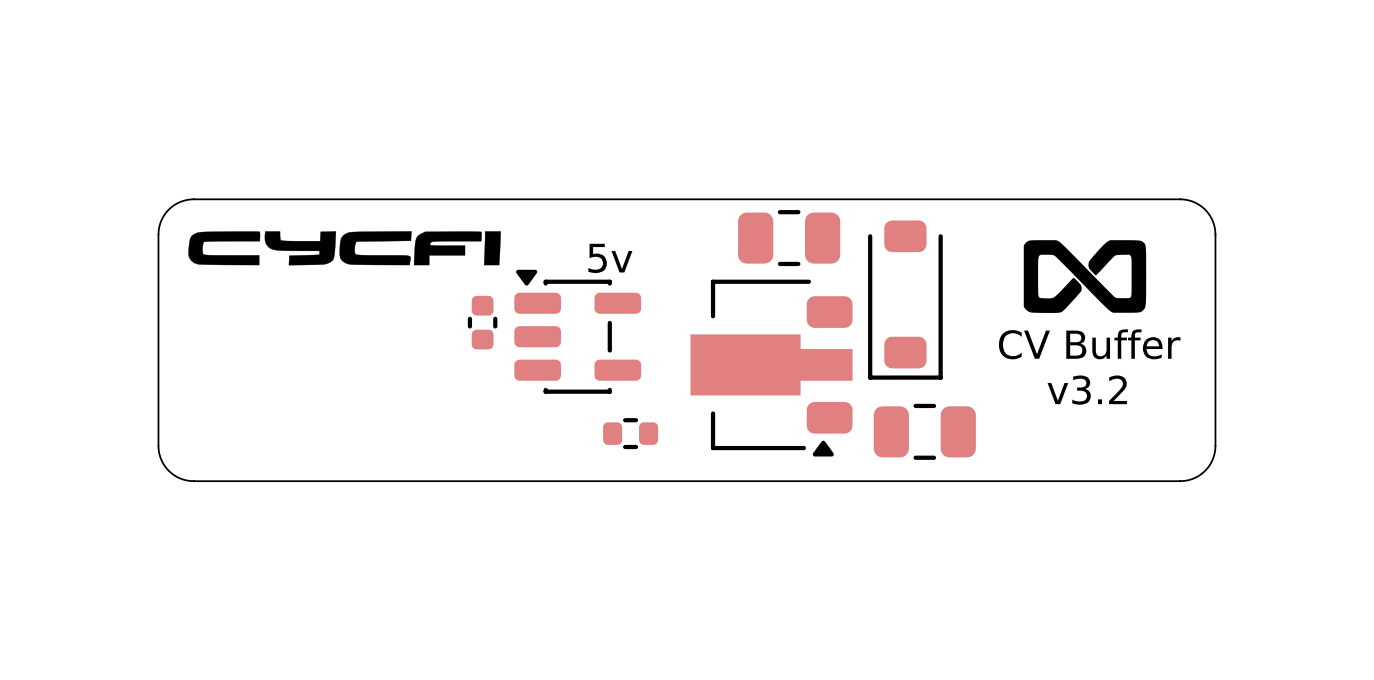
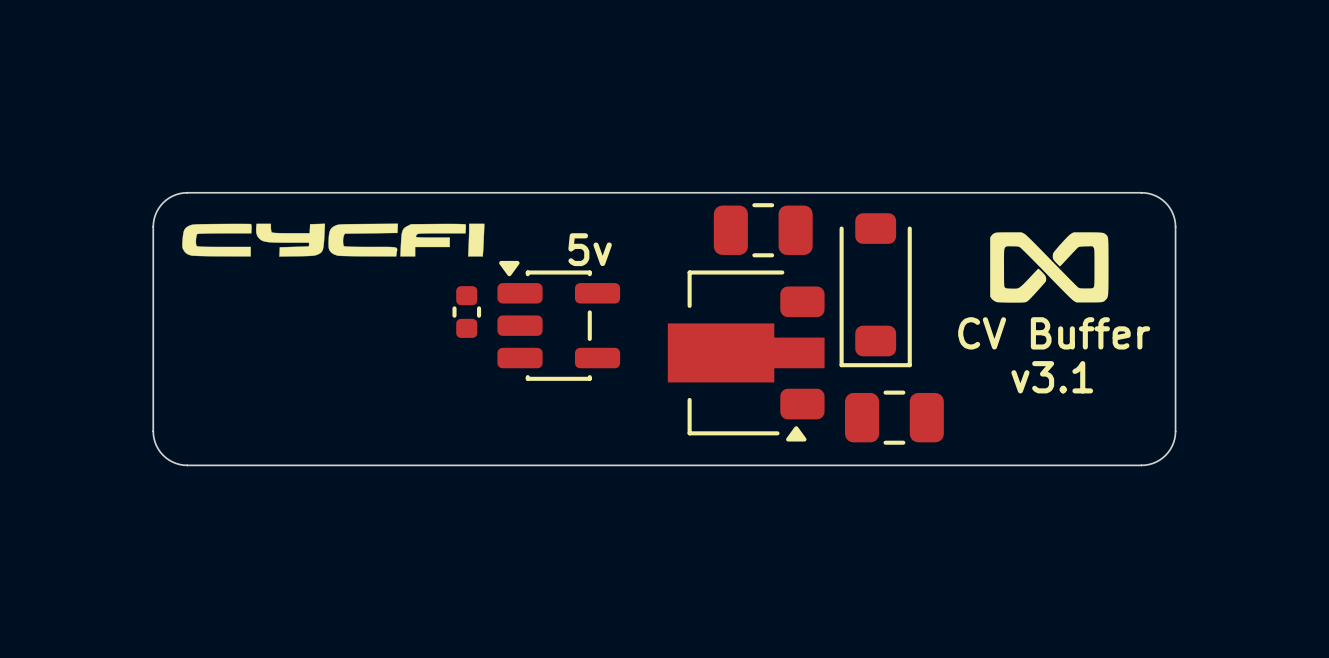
text: v3.2 (1087, 390) -> v3.1 (1052, 377)
part: (630, 433) -> none

